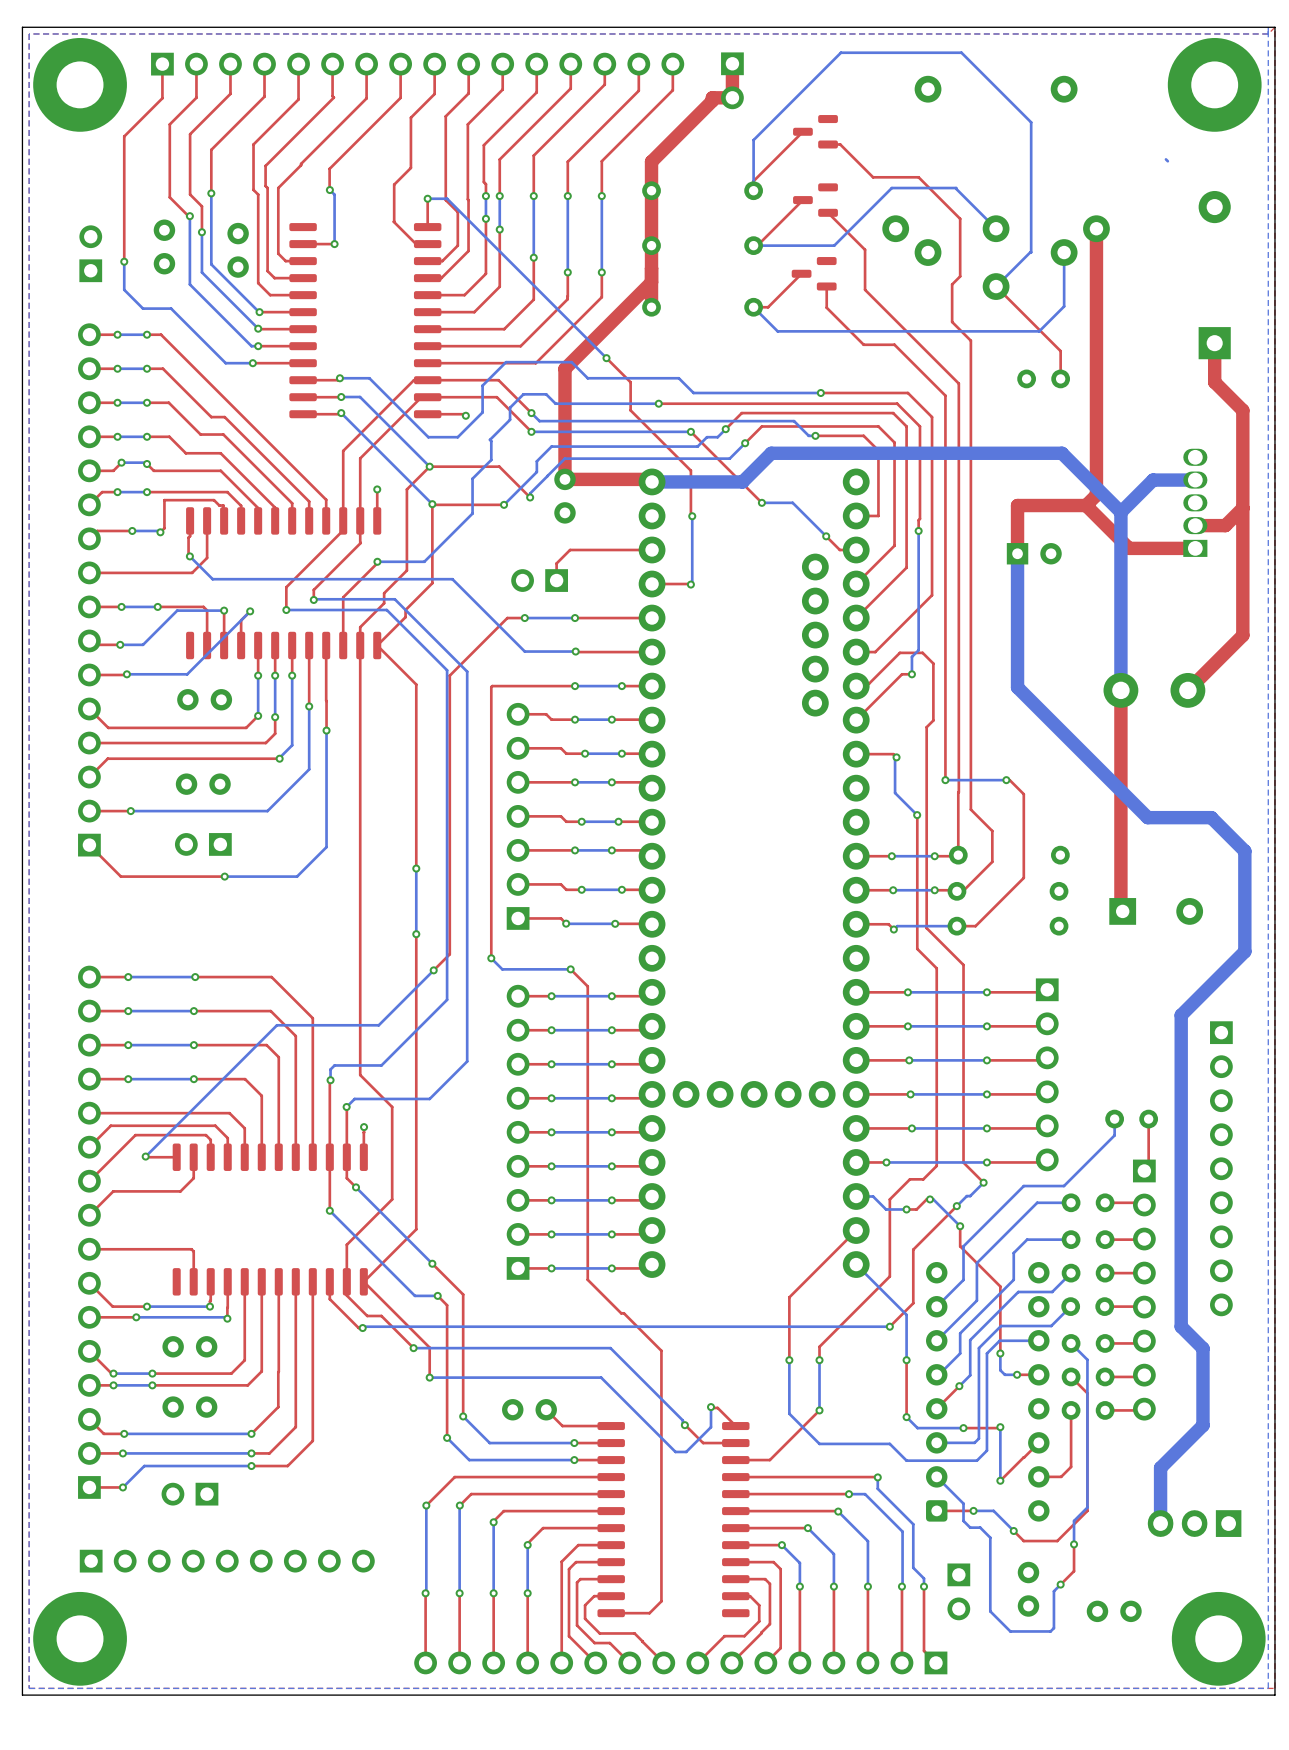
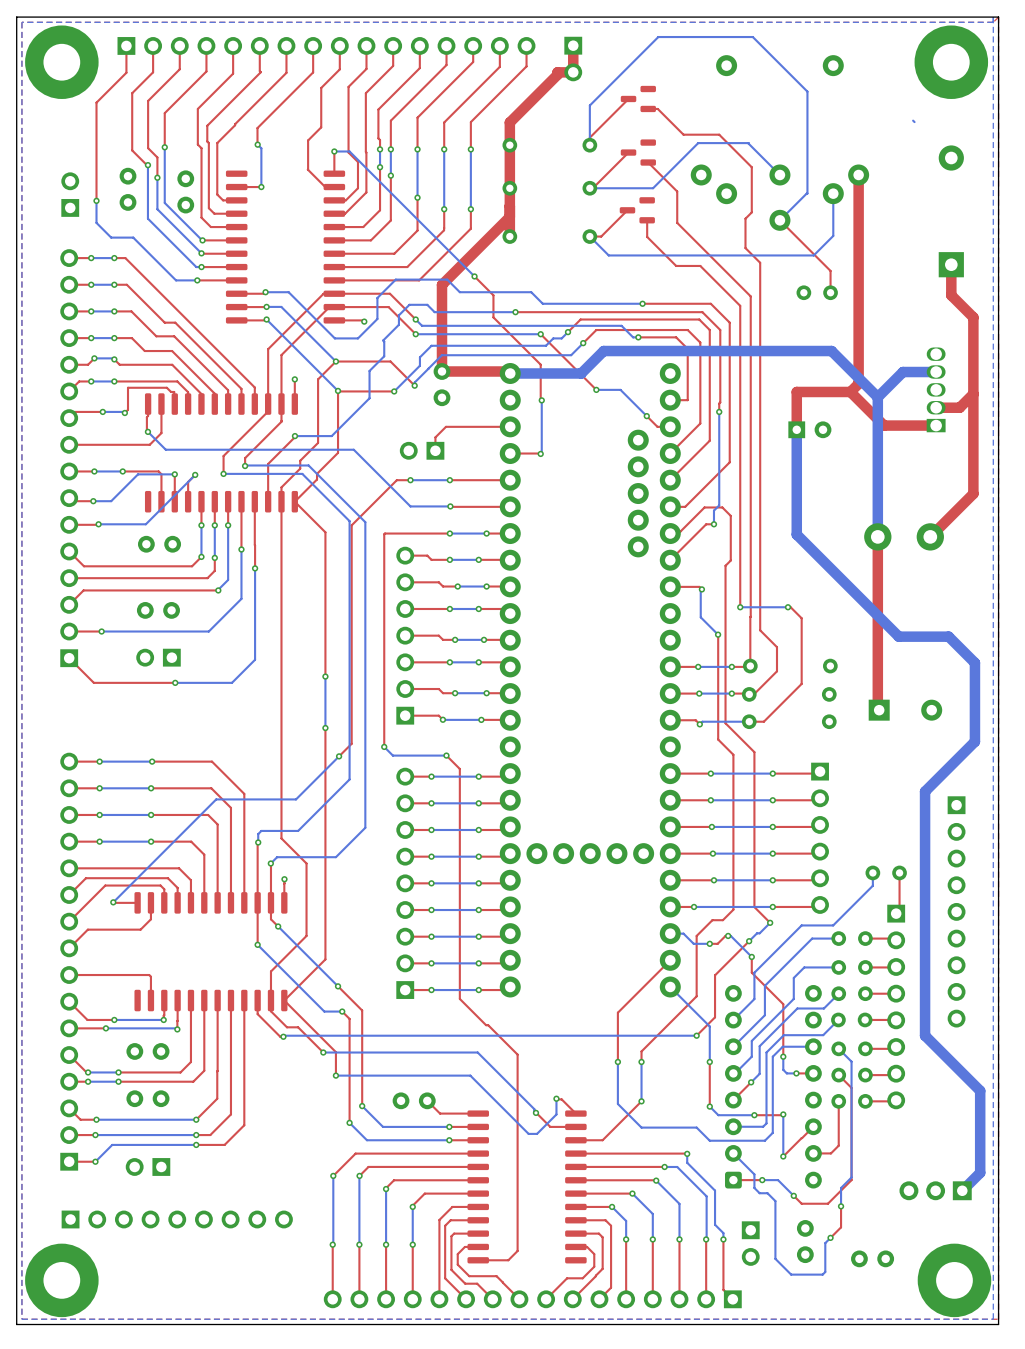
bottom track: (1202, 1348) (1202, 1425) (1160, 1467) (1160, 1523) -> (942, 1052) (980, 1090) (980, 1172) (962, 1190)
part footprint: [1147, 1510, 1242, 1537] -> [899, 1181, 972, 1201]

